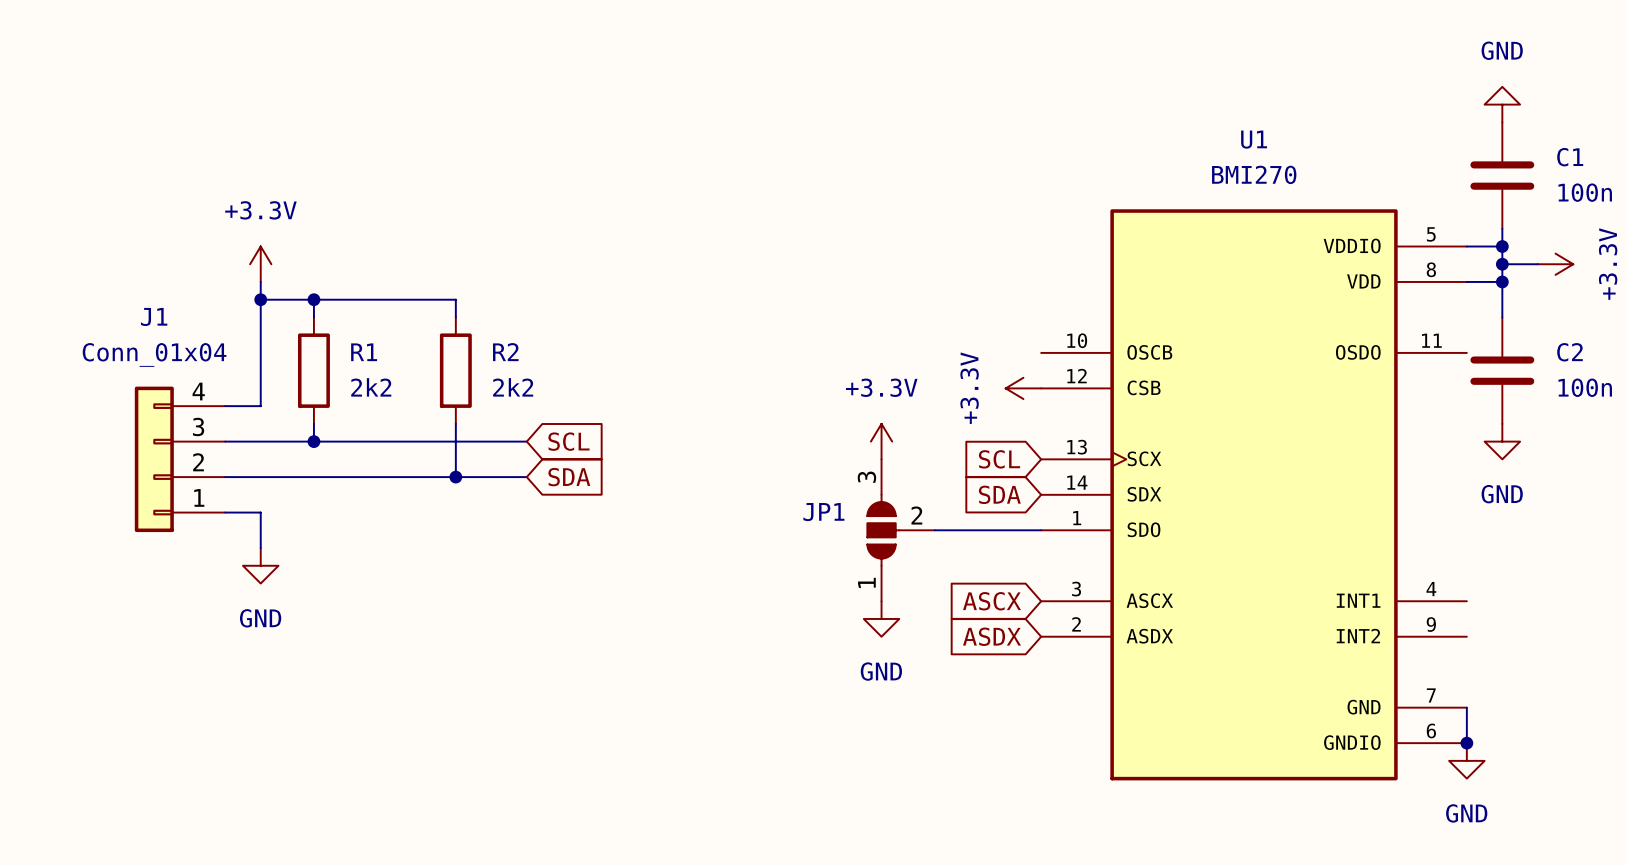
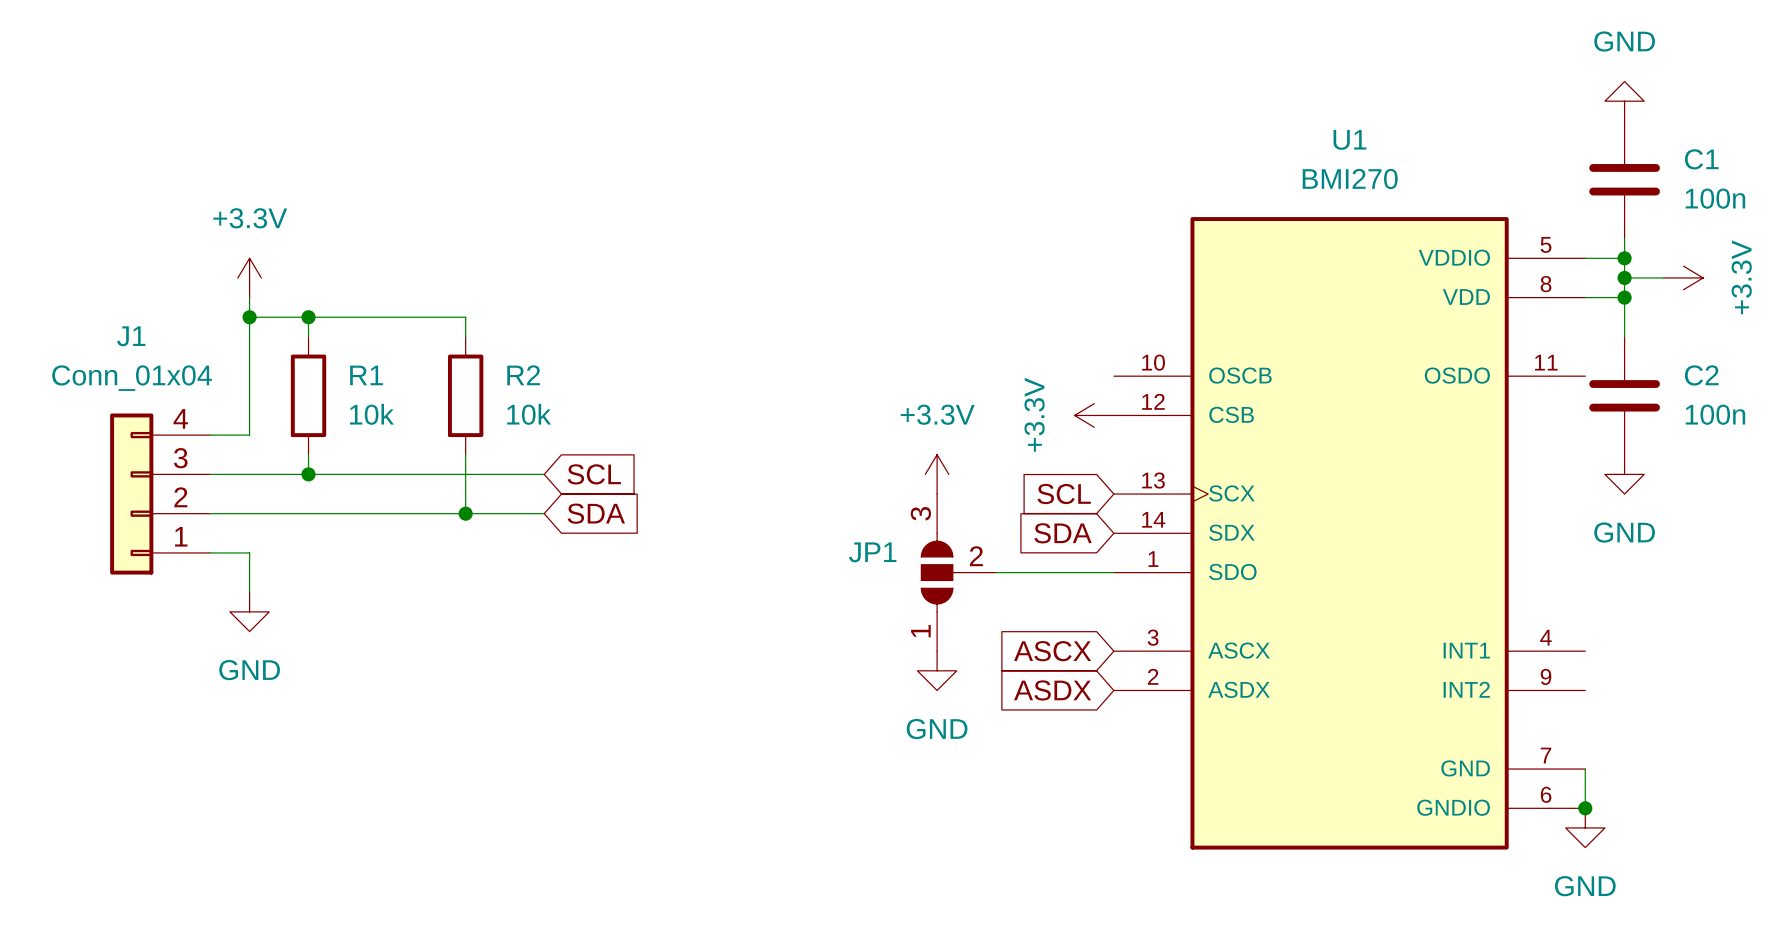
R1 value: 2k2 (371, 387) -> 10k (371, 414)
R2 value: 2k2 (513, 387) -> 10k (529, 414)

